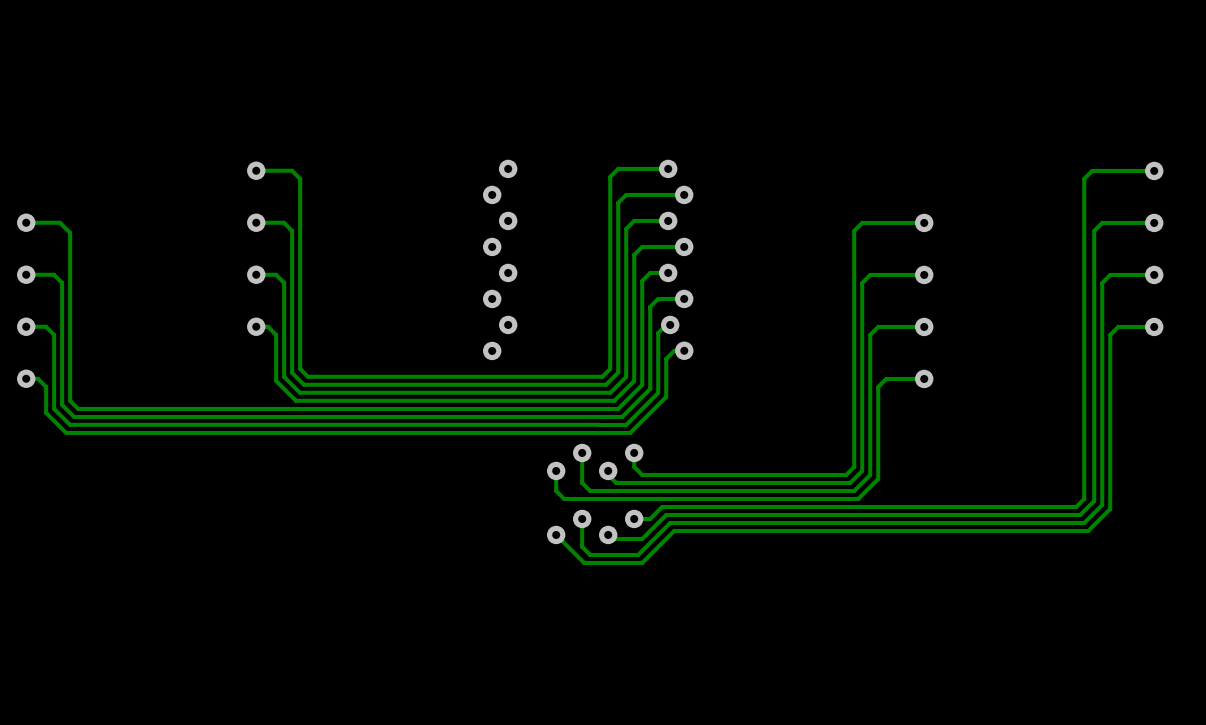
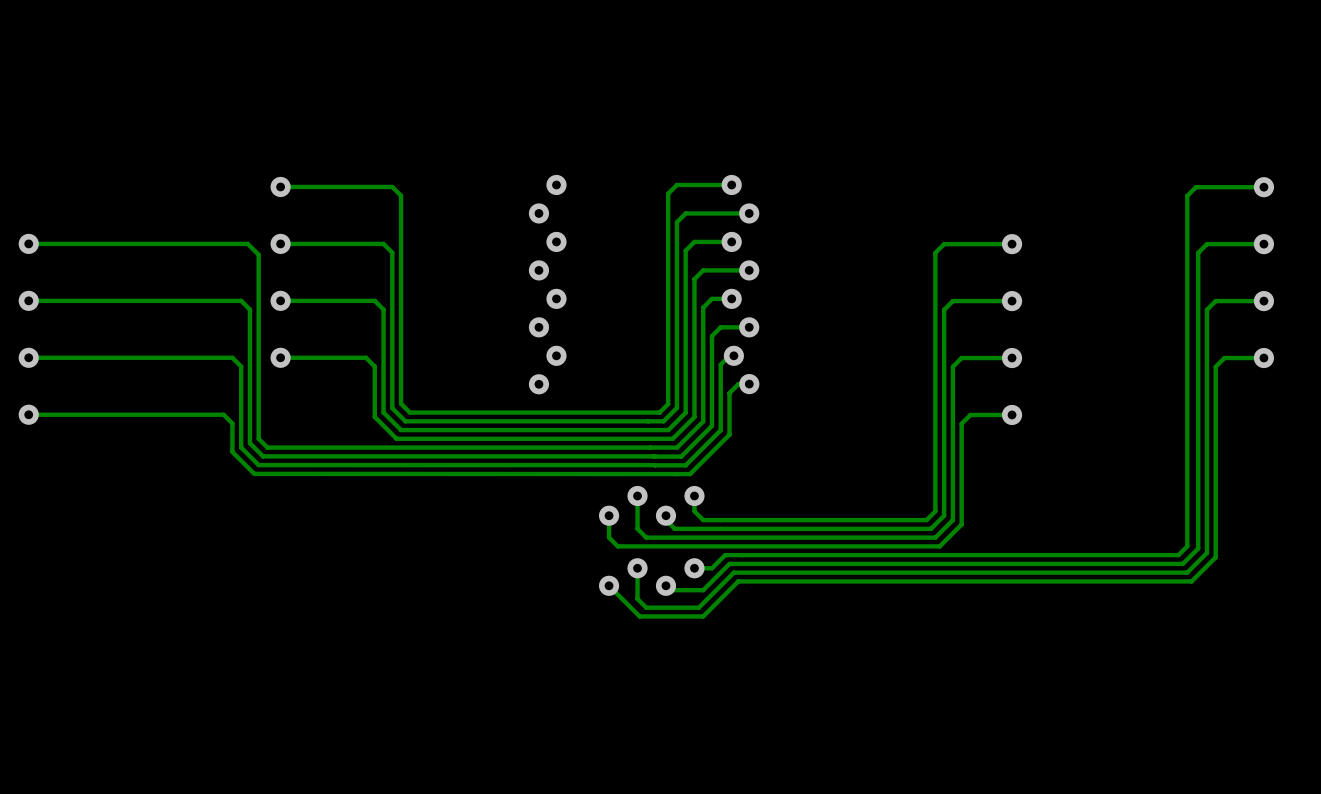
track: (291, 170) (300, 178) (300, 368) (307, 376) (374, 376) -> (319, 186) (392, 186) (401, 195) (401, 403) (409, 412)
track: (59, 222) (70, 232) (70, 400) (78, 408) (618, 408) -> (65, 243) (247, 243) (258, 254) (258, 438) (267, 447) (677, 447)
track: (283, 222) (292, 230) (292, 372) (303, 384) (370, 384) -> (310, 243) (383, 243) (392, 252) (392, 408) (405, 421)
track: (53, 274) (62, 282) (62, 404) (74, 416) (596, 416) -> (59, 300) (241, 300) (249, 309) (249, 443) (263, 456) (655, 456)
track: (275, 274) (284, 282) (284, 376) (299, 392) (366, 392) -> (302, 300) (374, 300) (383, 309) (383, 412) (401, 430)
track: (45, 326) (54, 334) (54, 408) (69, 424) (236, 424) -> (50, 357) (232, 357) (241, 366) (241, 447) (258, 465)
track: (267, 326) (276, 334) (276, 380) (295, 400) (362, 400) -> (293, 357) (366, 357) (374, 366) (374, 416) (396, 438)
track: (37, 378) (46, 386) (46, 412) (65, 432) -> none
track: (618, 432) (66, 432) -> (676, 474) (254, 473) (232, 451) (232, 423) (223, 414) (41, 414)

